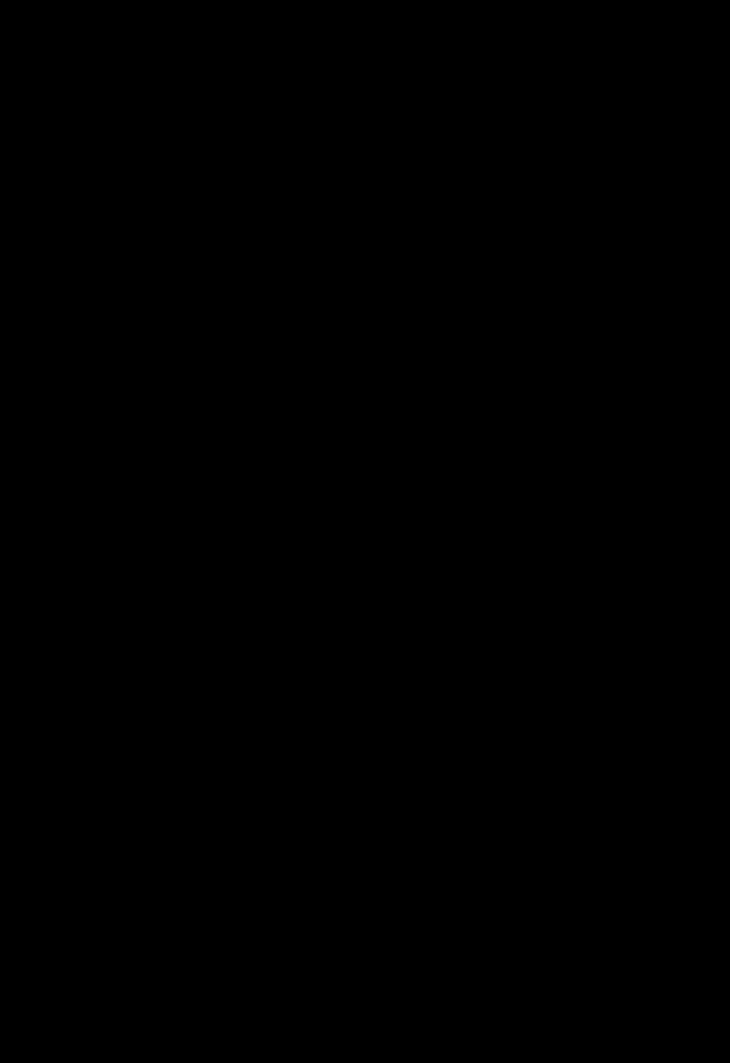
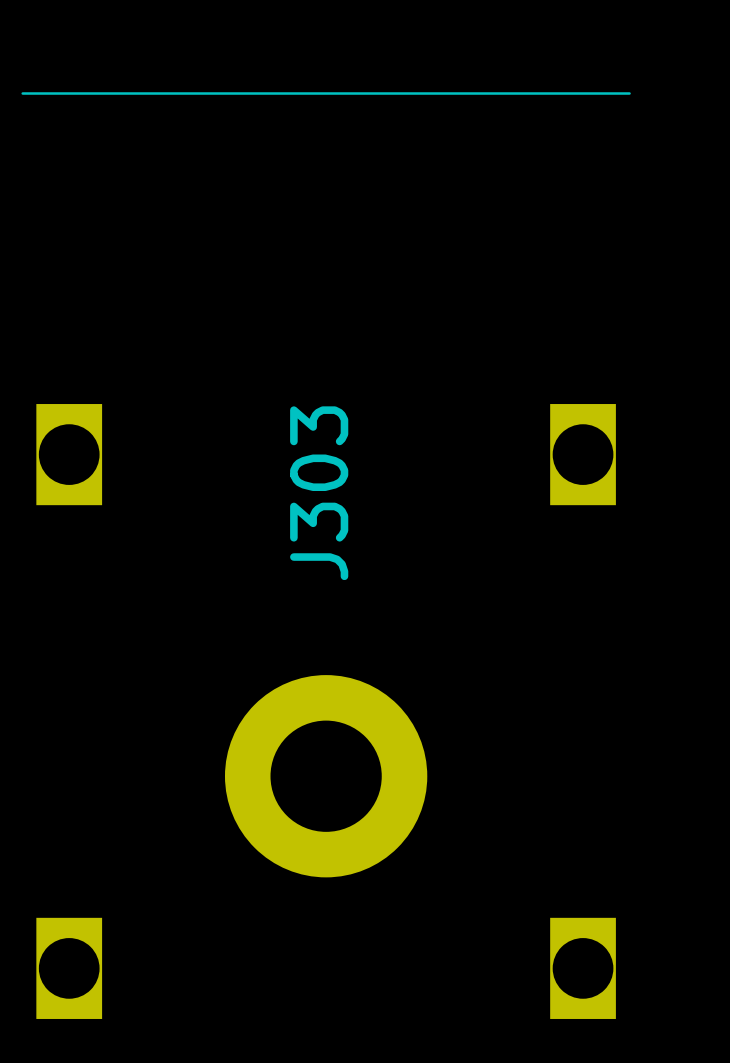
J303: none -> (326, 555)

